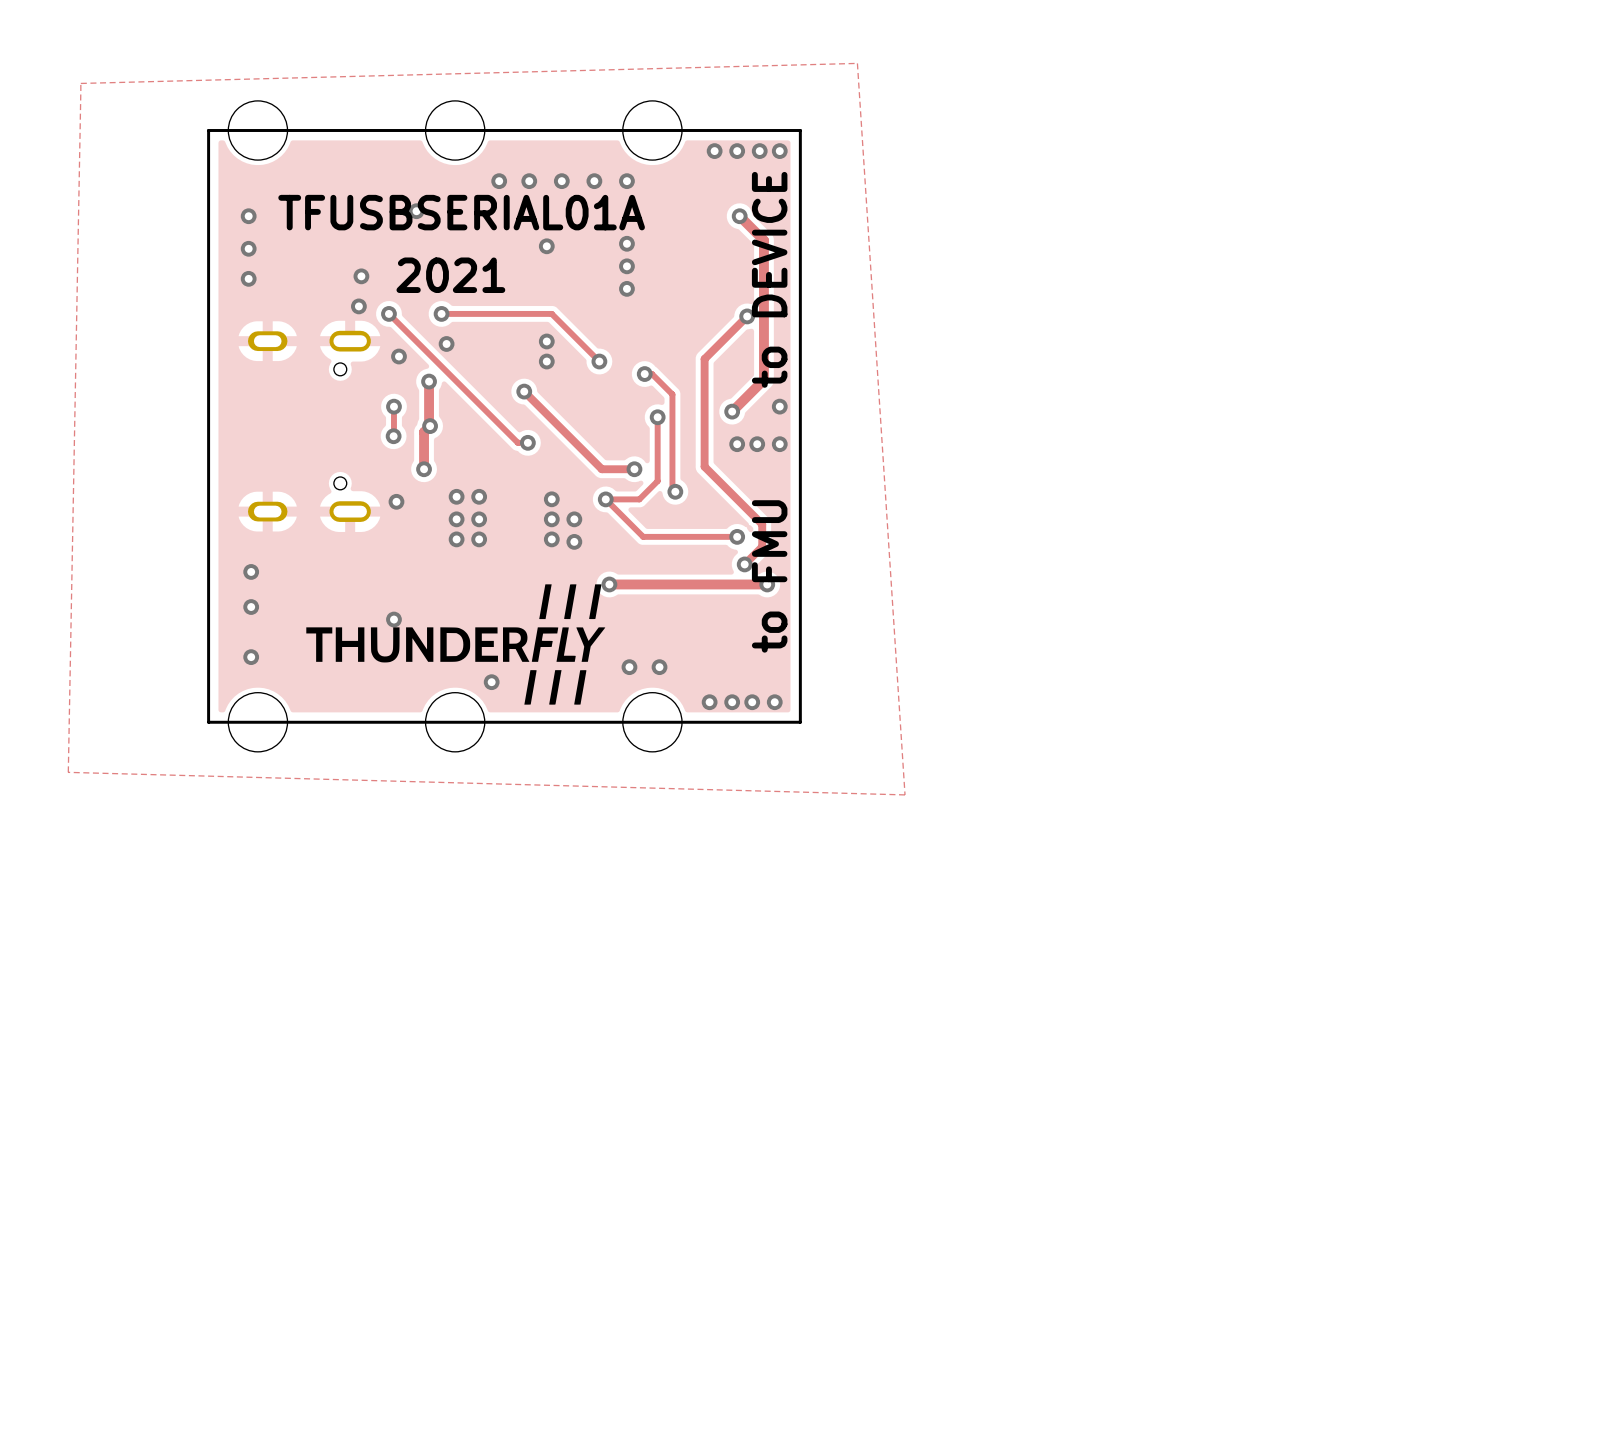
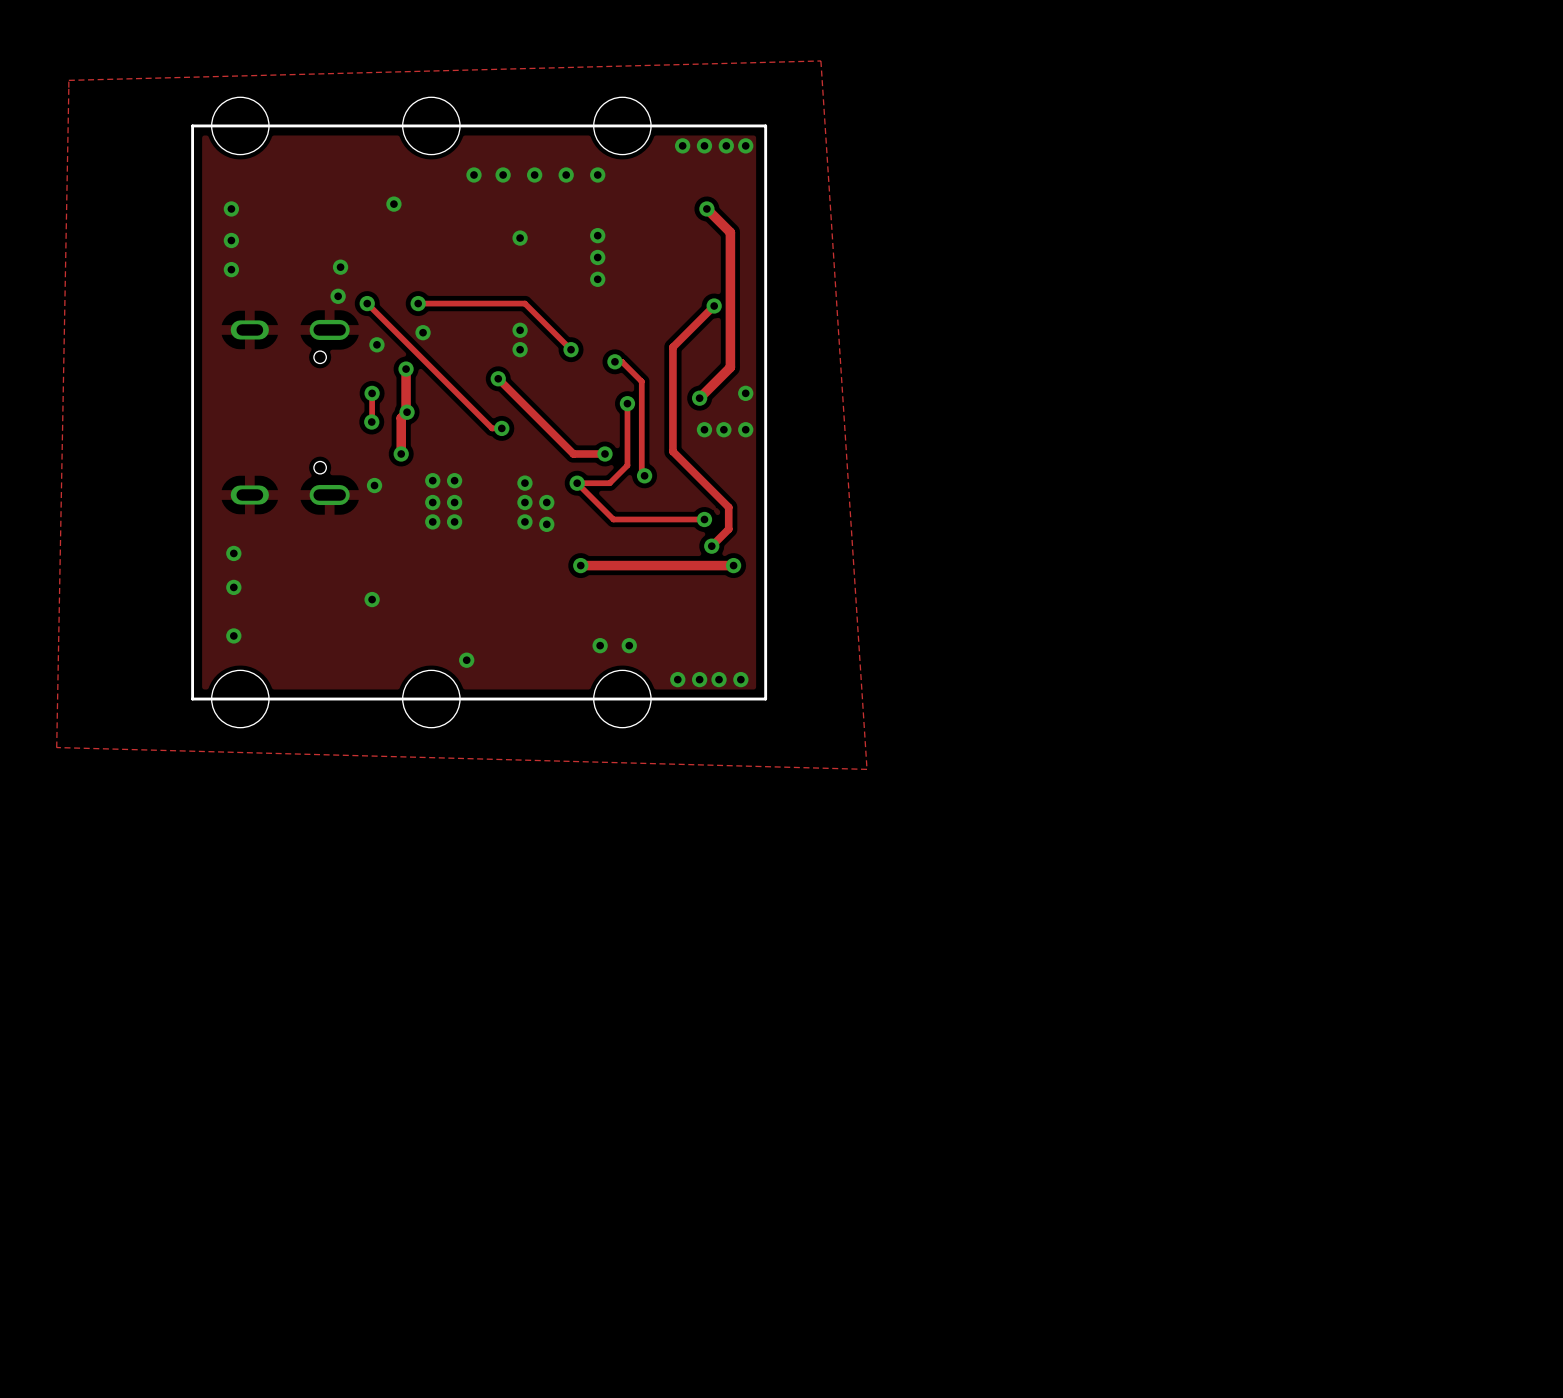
text: TFUSBSERIAL01A (461, 212) -> none
text: 2021 (450, 275) -> none
text: to DEVICE (769, 279) -> none
text: to FMU (769, 576) -> none
drawing: [306, 584, 606, 705] -> none

